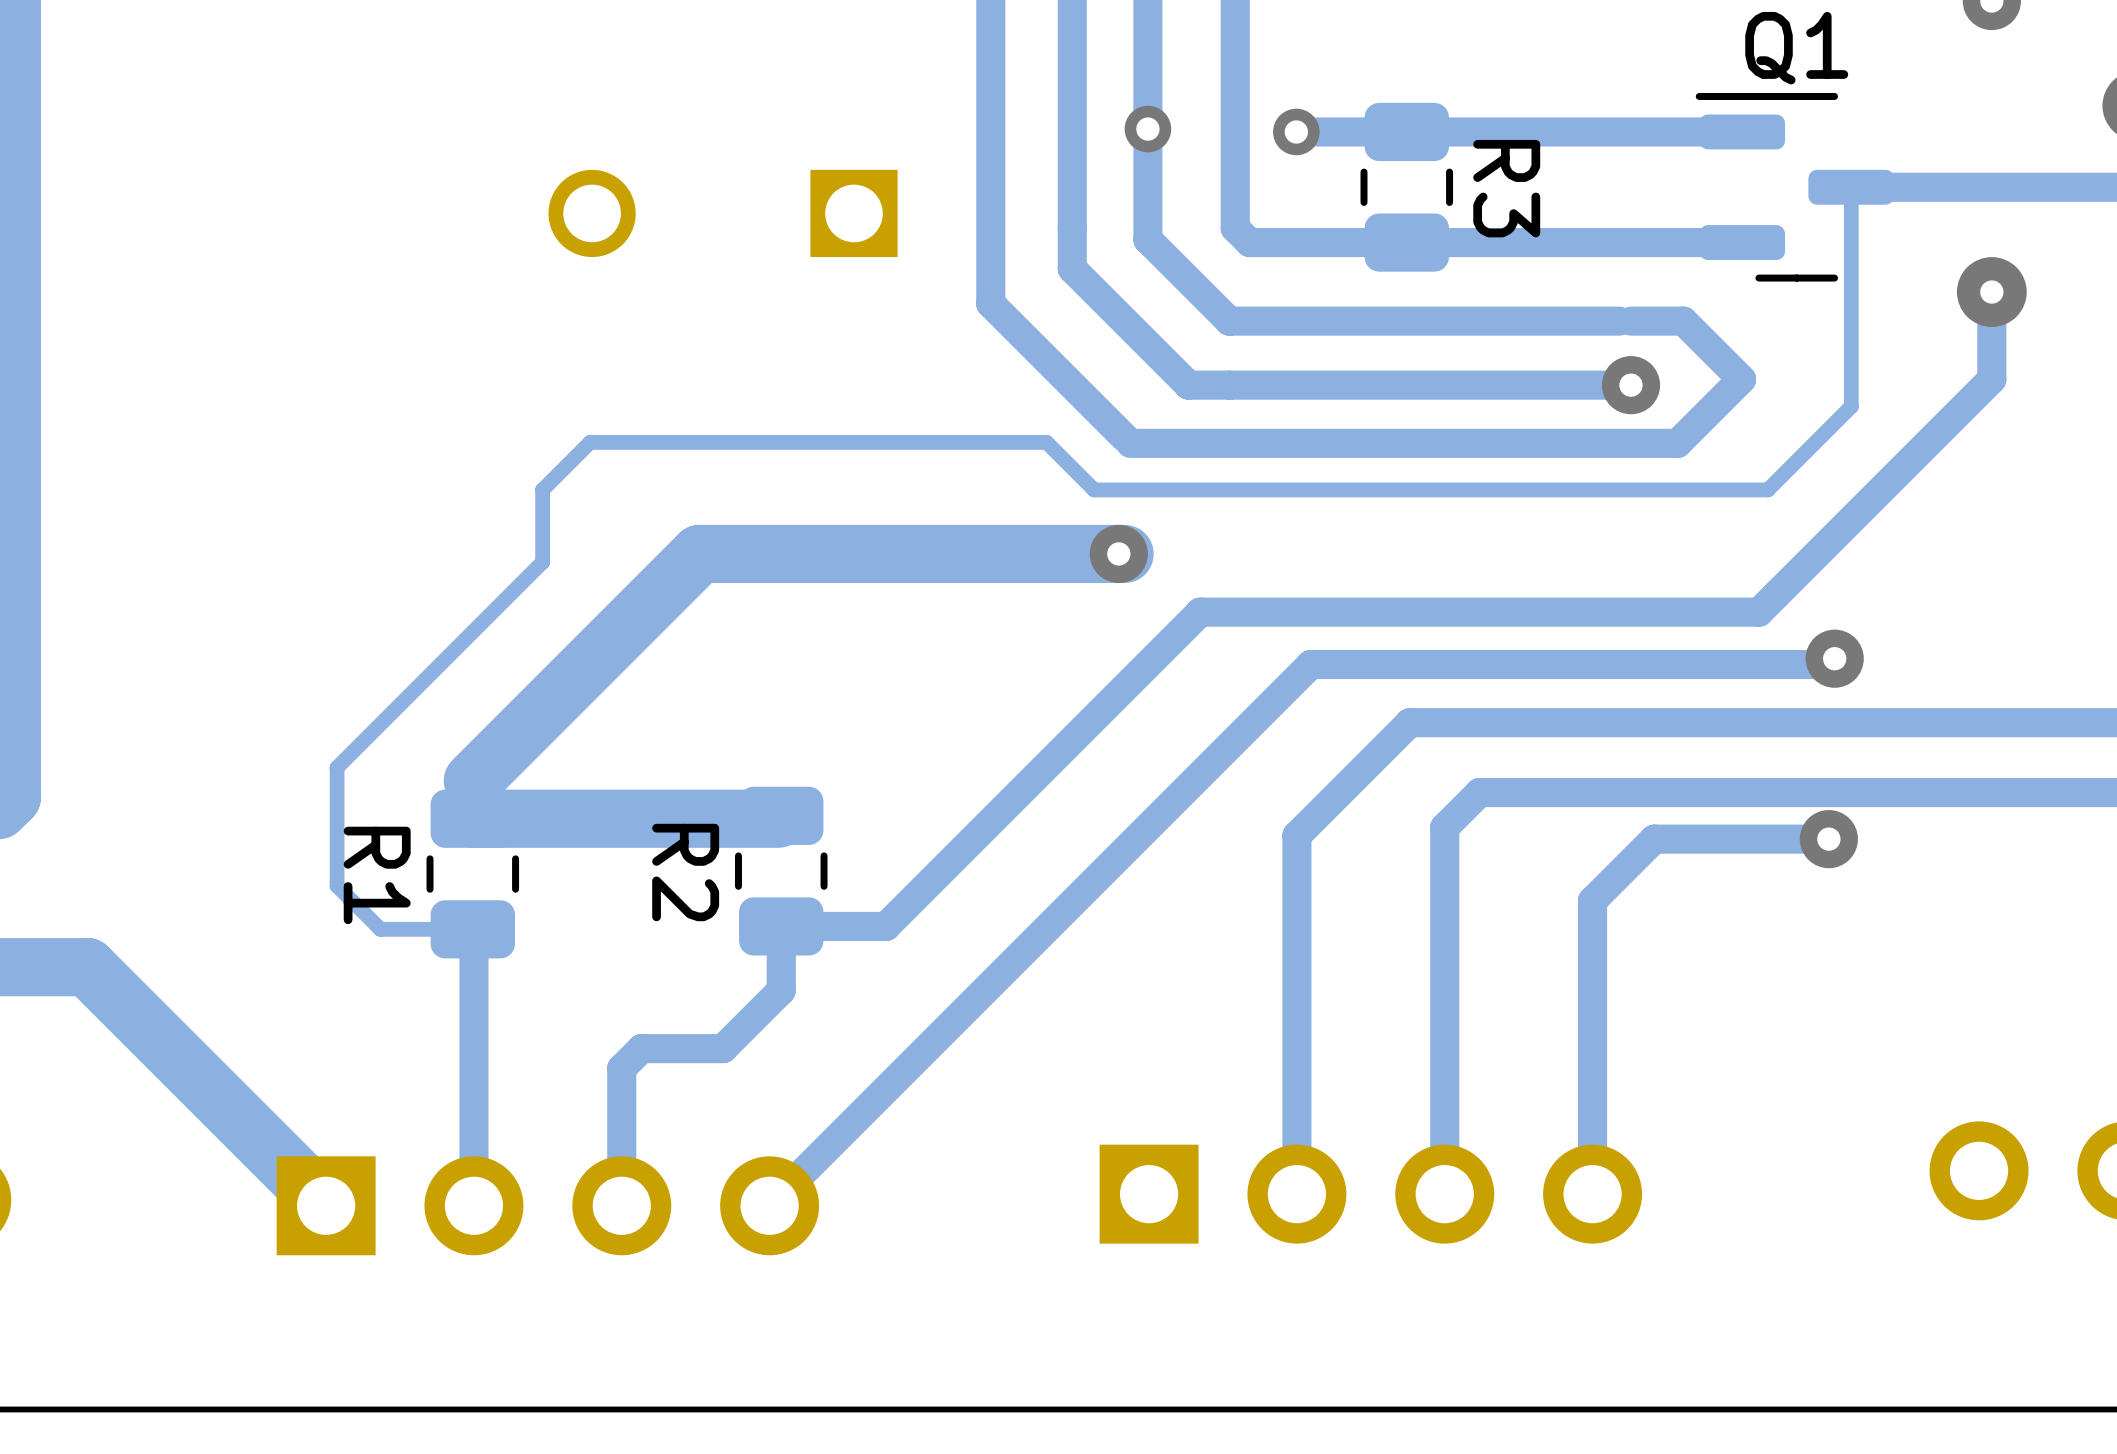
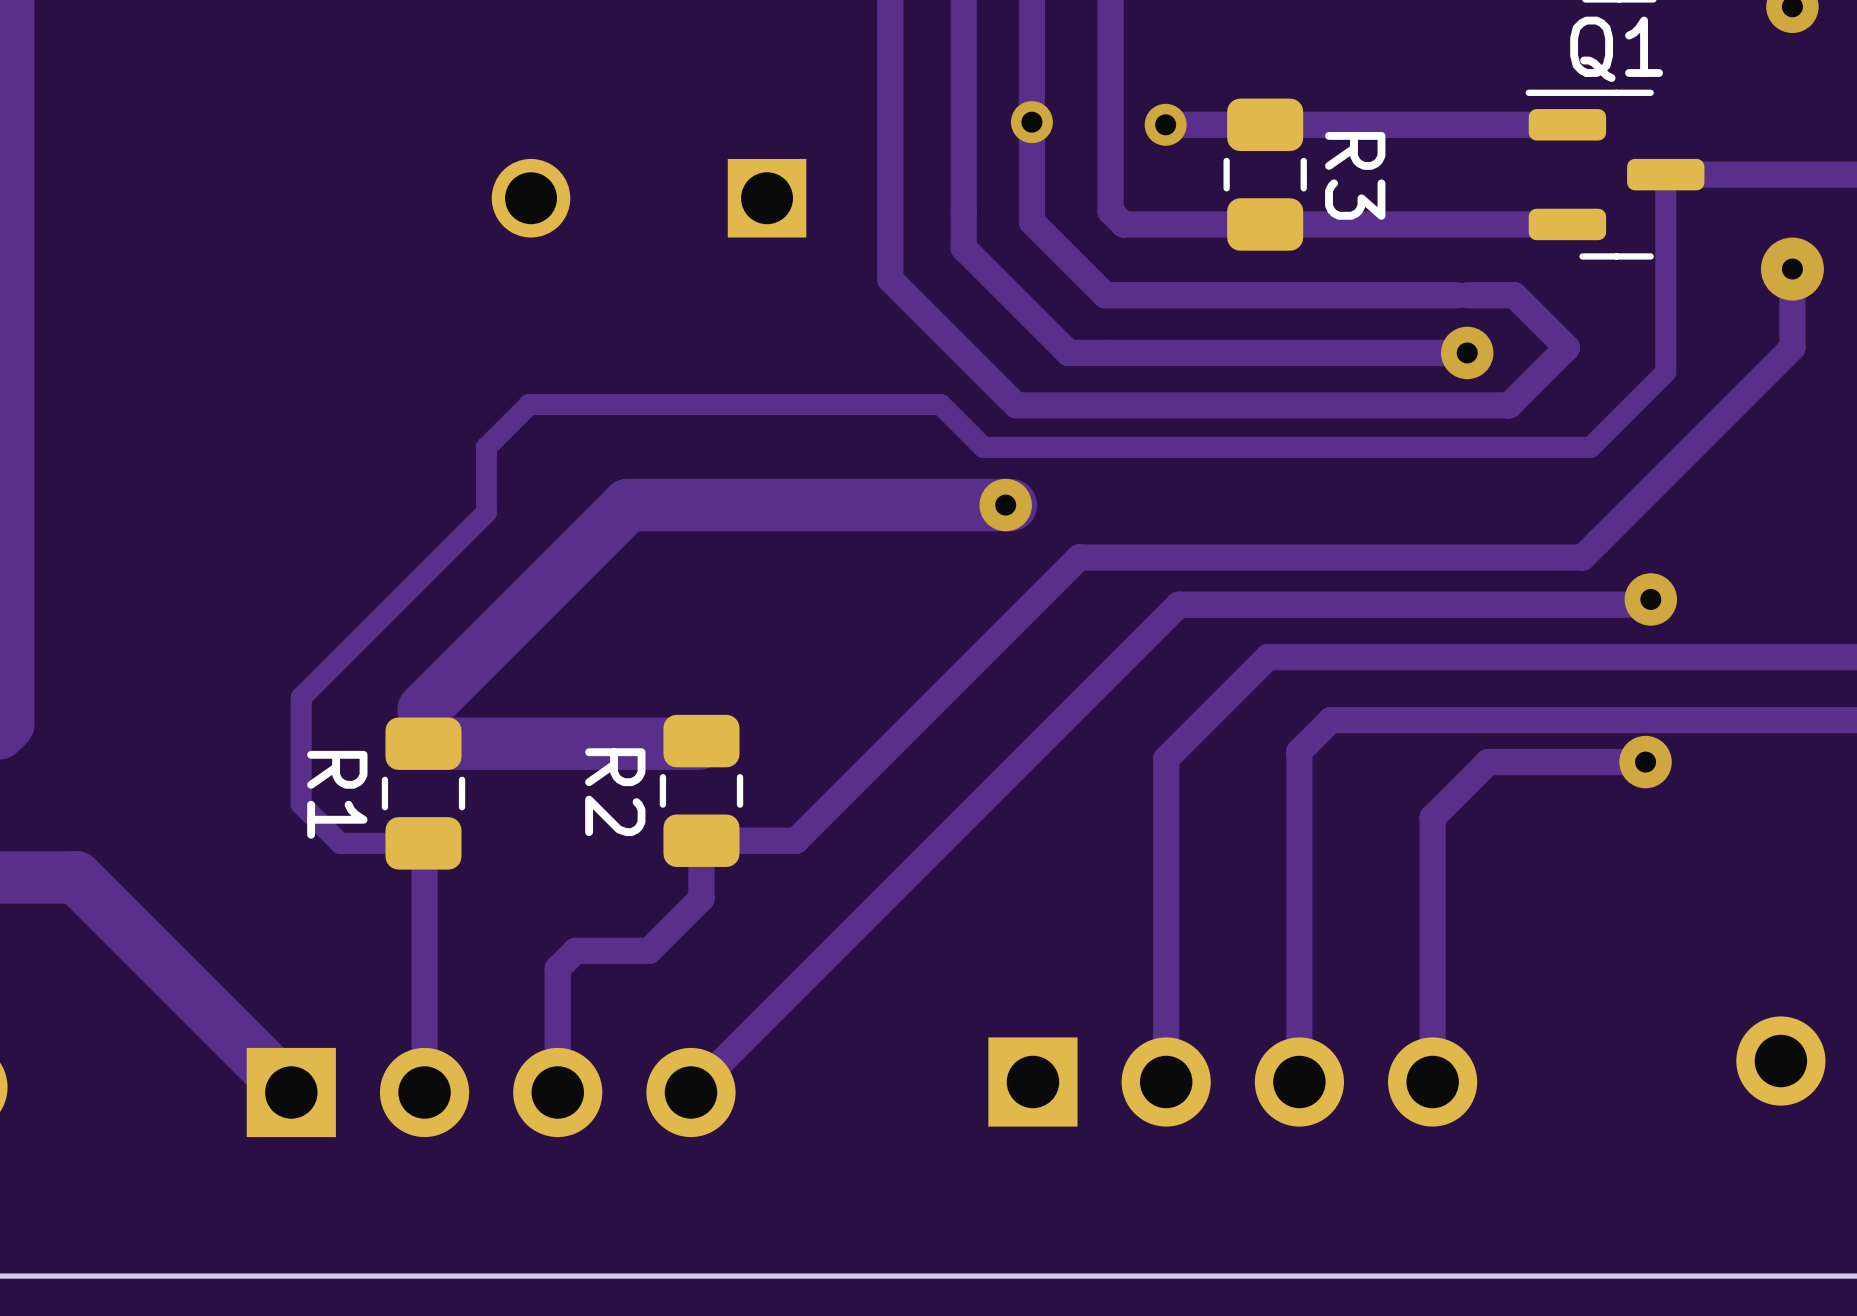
track width: thin (1851, 187) (1851, 406) (1767, 489) (1094, 489) (1046, 442) (590, 442) (542, 489) (542, 562) (337, 767) (337, 885) (380, 929) (472, 929) -> thick (1665, 174) (1665, 372) (1590, 447) (983, 447) (940, 404) (529, 404) (486, 447) (486, 512) (301, 697) (301, 804) (340, 843) (423, 843)

